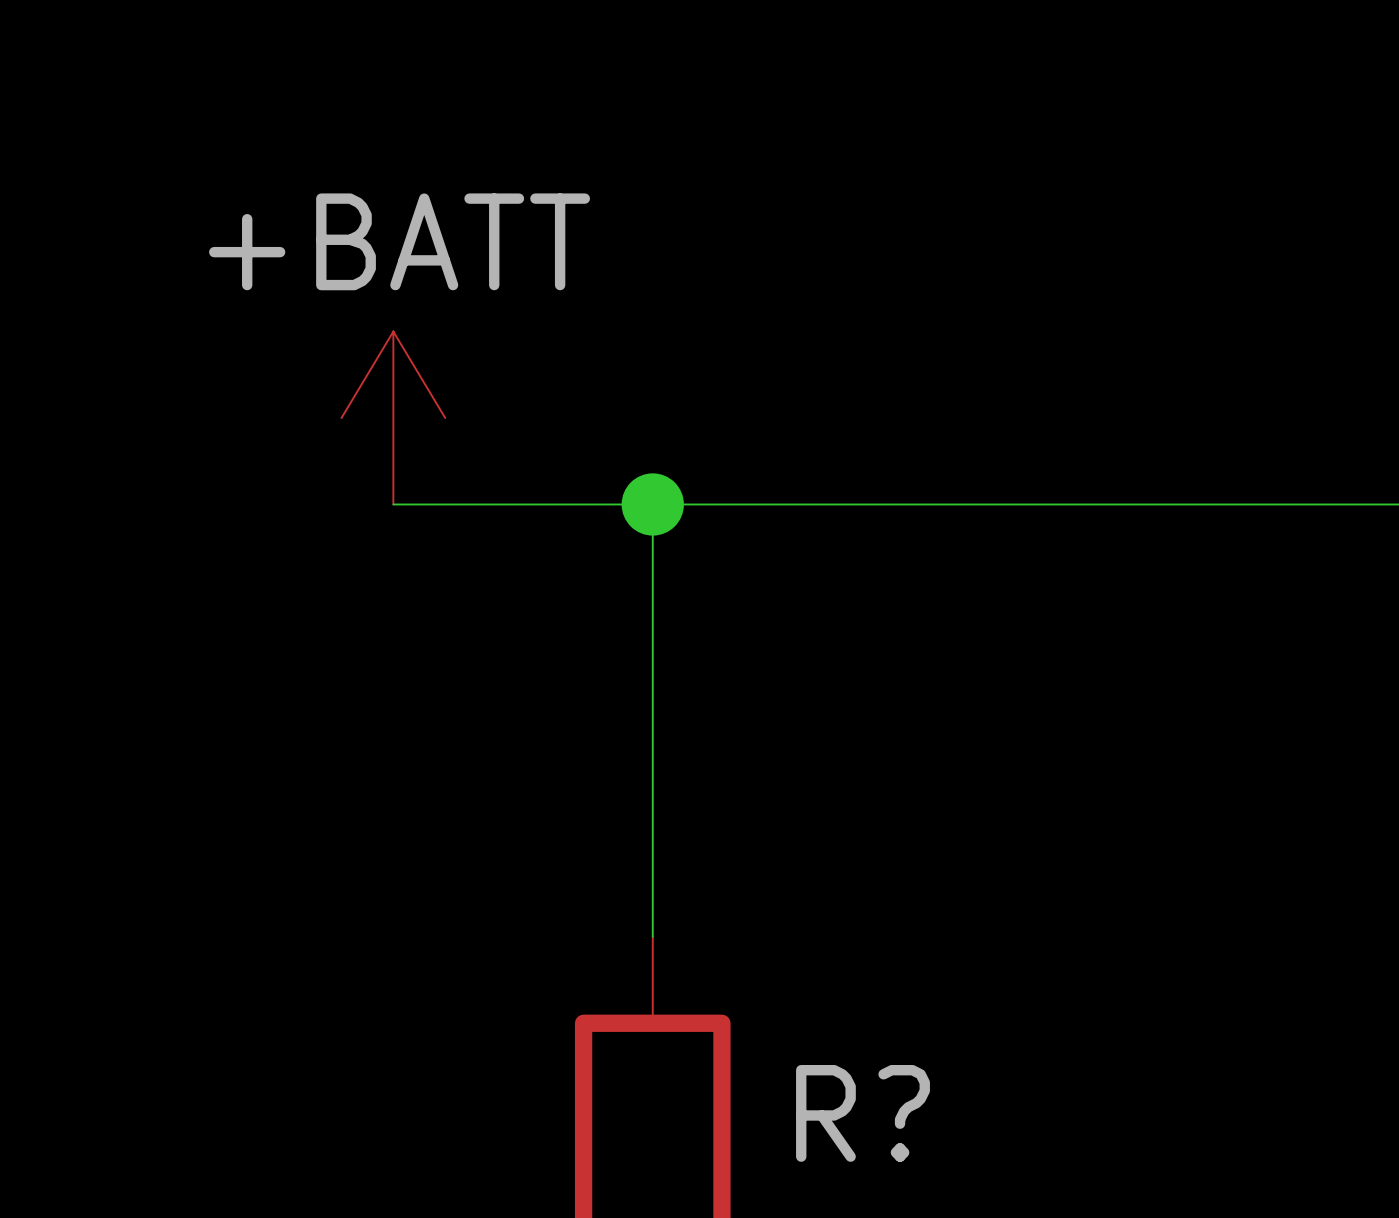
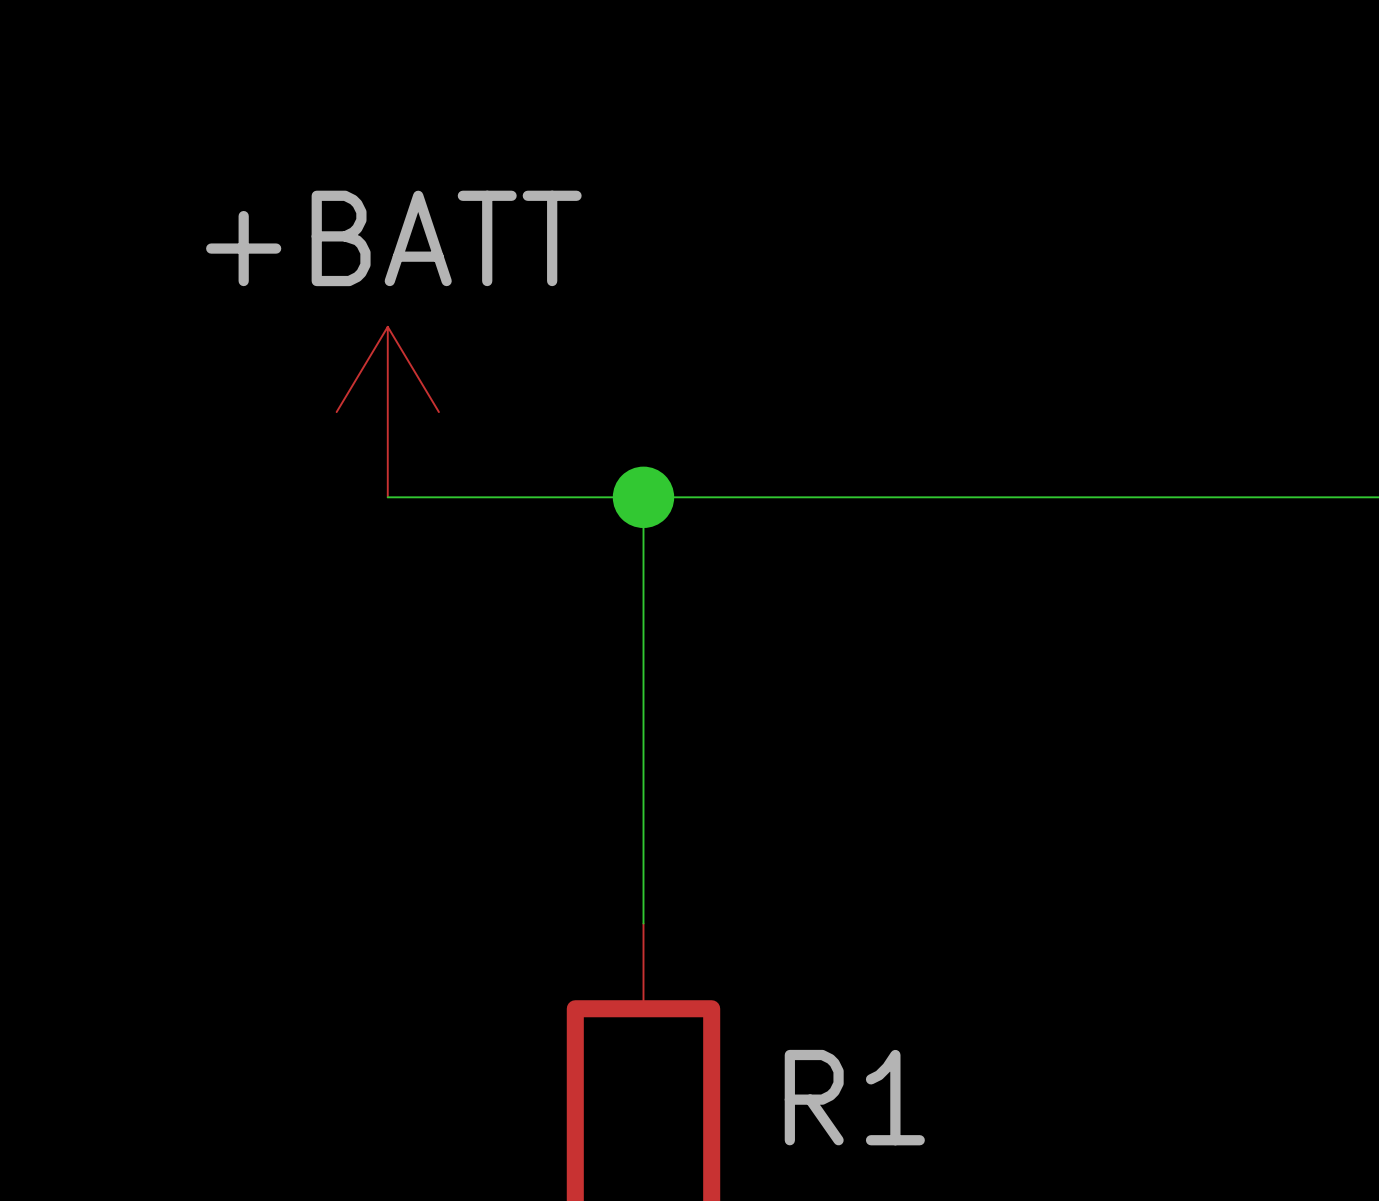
R? name: R? (862, 1113) -> R1 (854, 1097)

